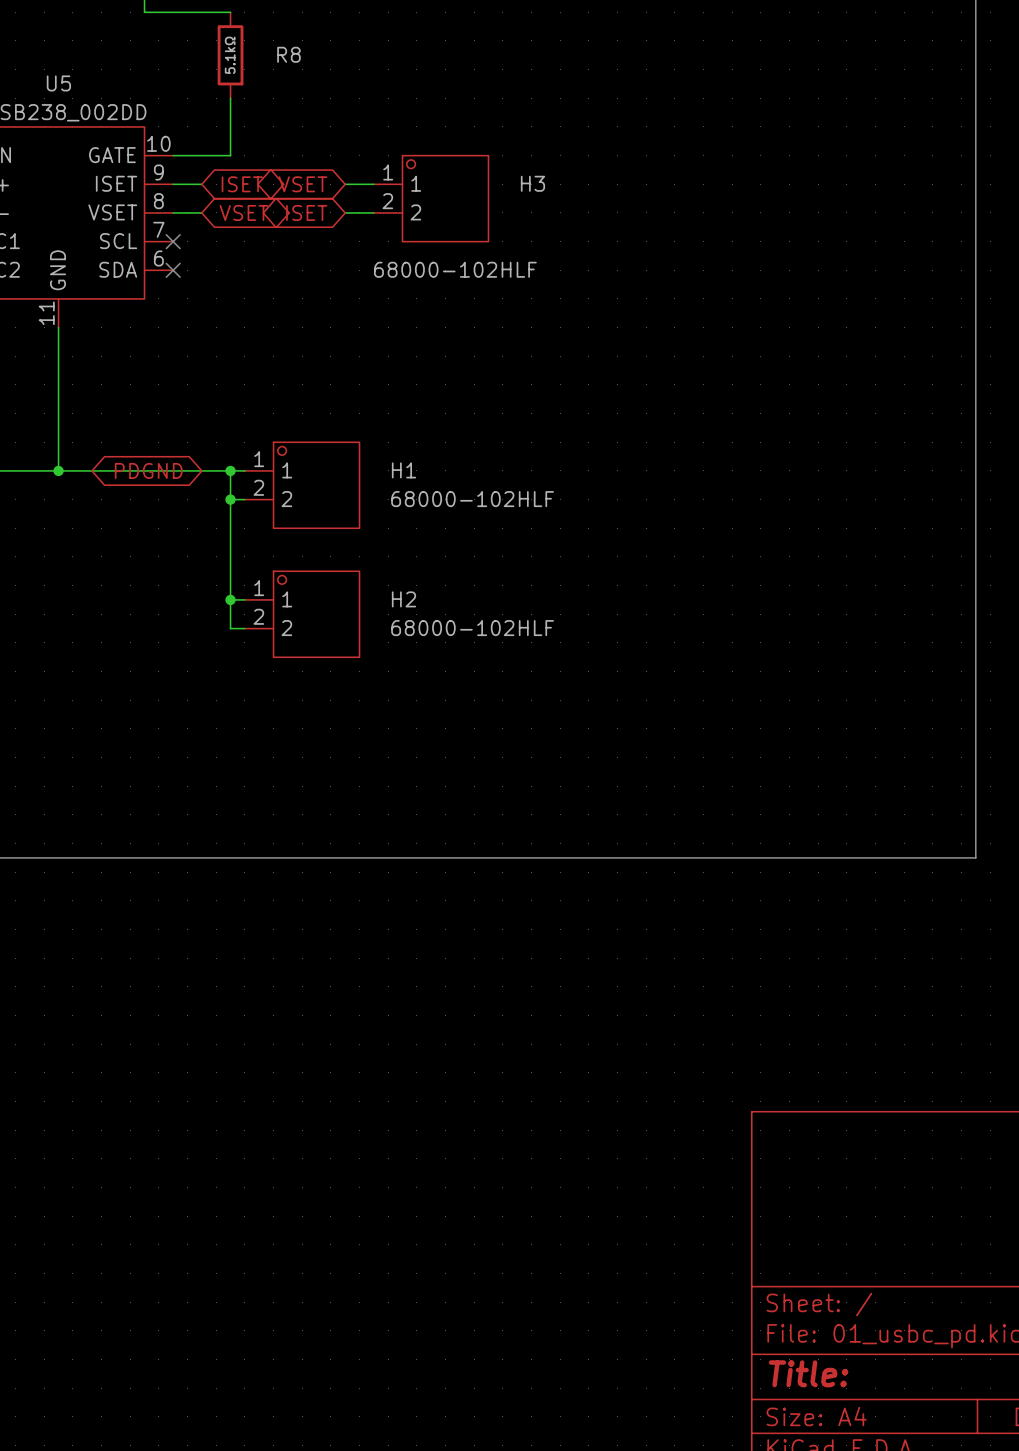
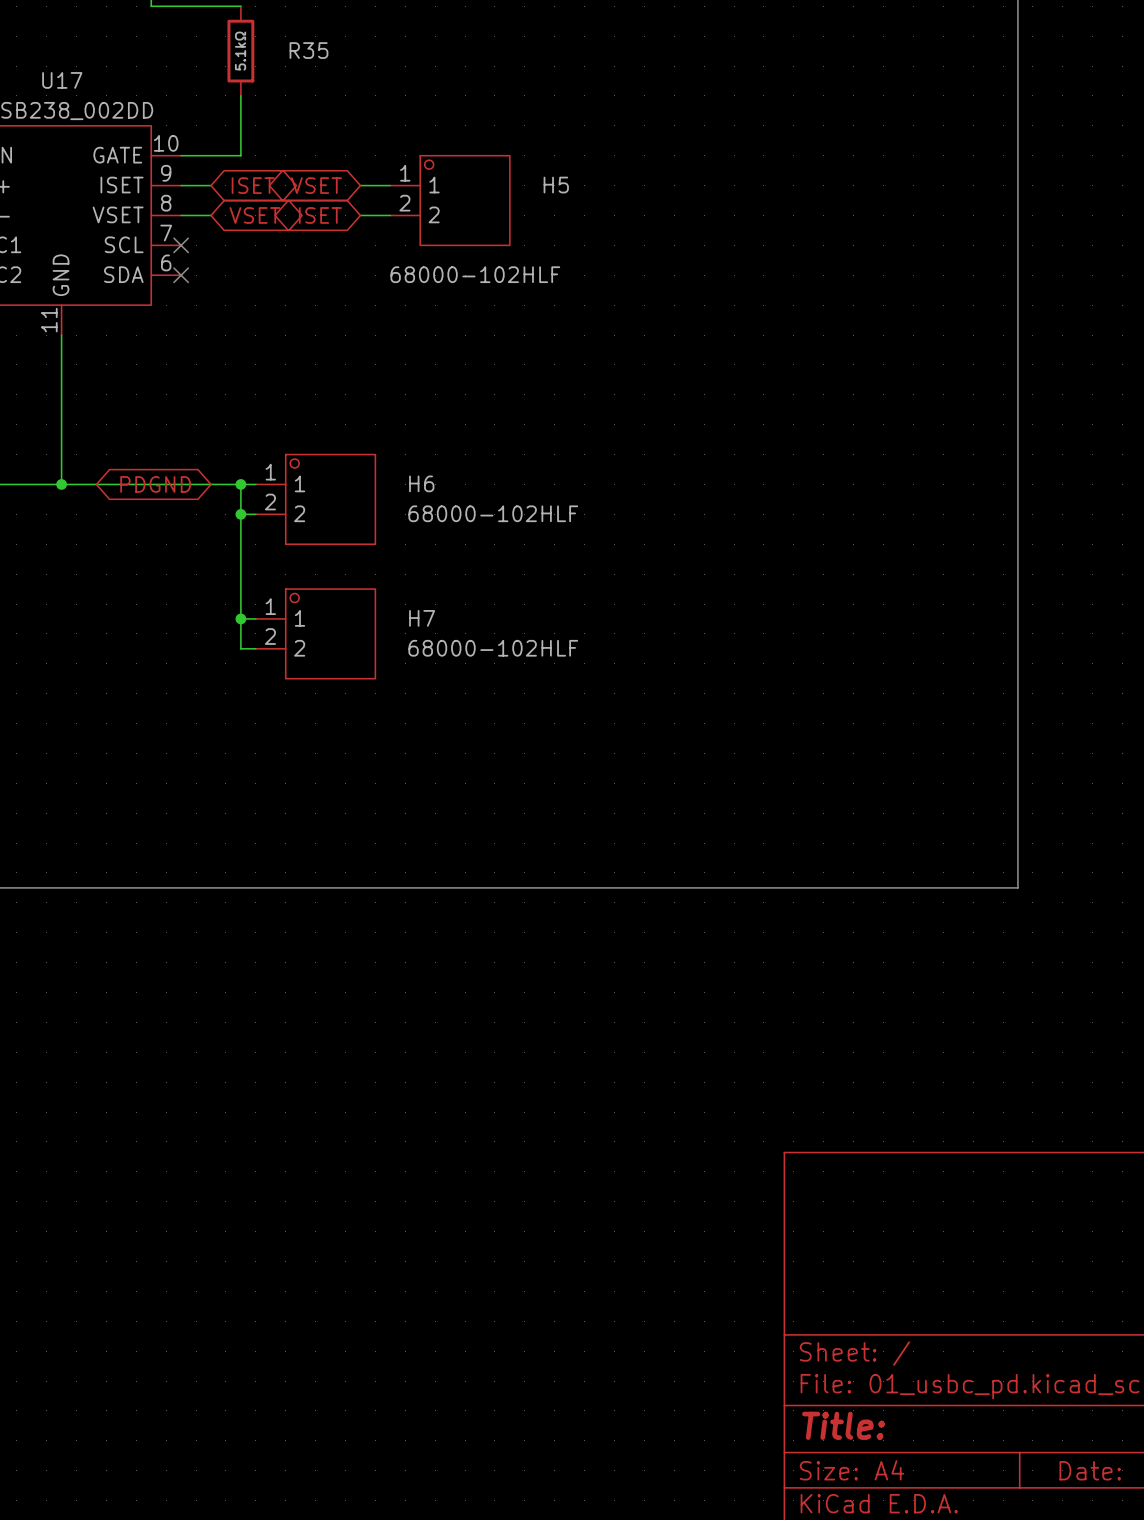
R8 name: R8 (288, 54) -> R35 (308, 50)
U5 name: U5 (58, 83) -> U17 (62, 80)
H3 name: H3 (532, 183) -> H5 (556, 185)
H1 name: H1 (403, 470) -> H6 (421, 483)
H2 name: H2 (403, 599) -> H7 (422, 618)

